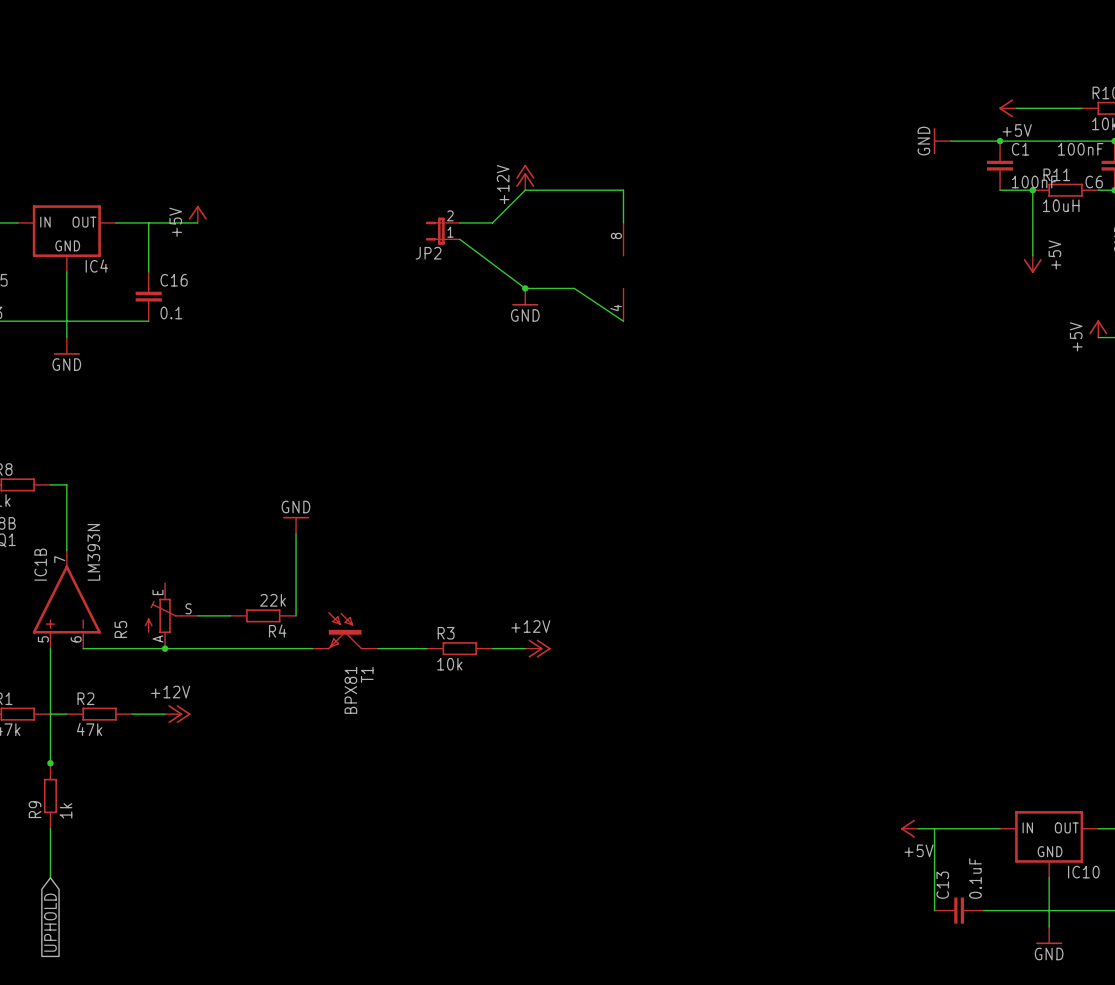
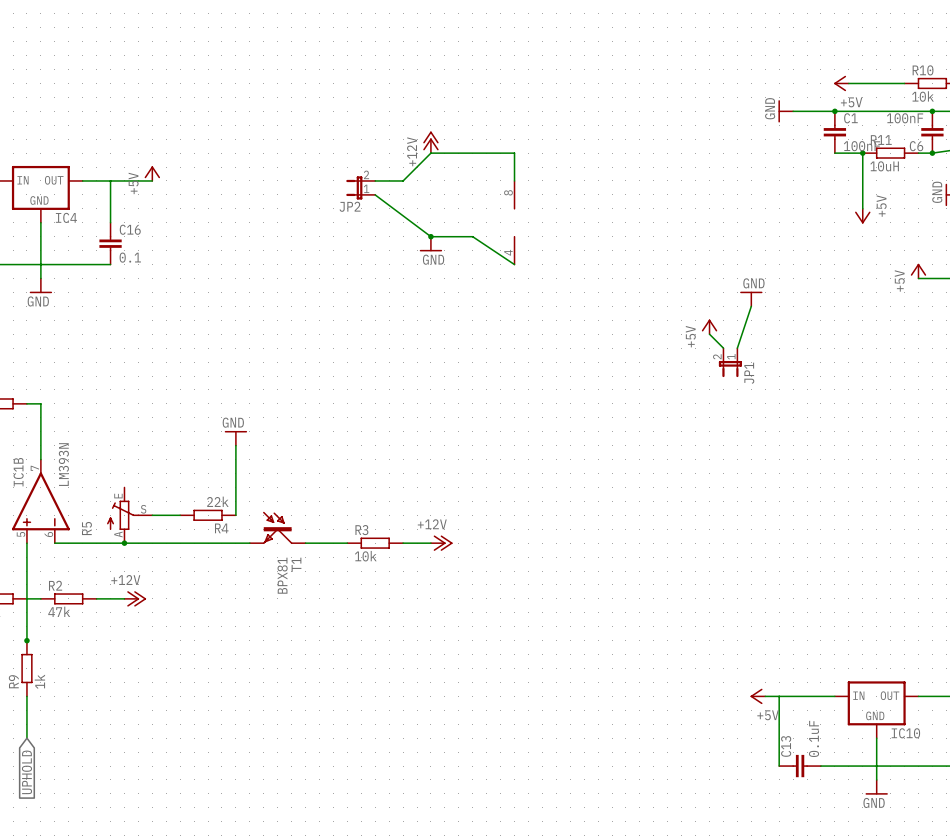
power symbol: none -> GND (751, 299)
wire: none -> (751, 306) (737, 348)
power symbol: none -> +5V (709, 326)
wire: none -> (709, 334) (723, 348)
JP1: none -> (730, 362)

